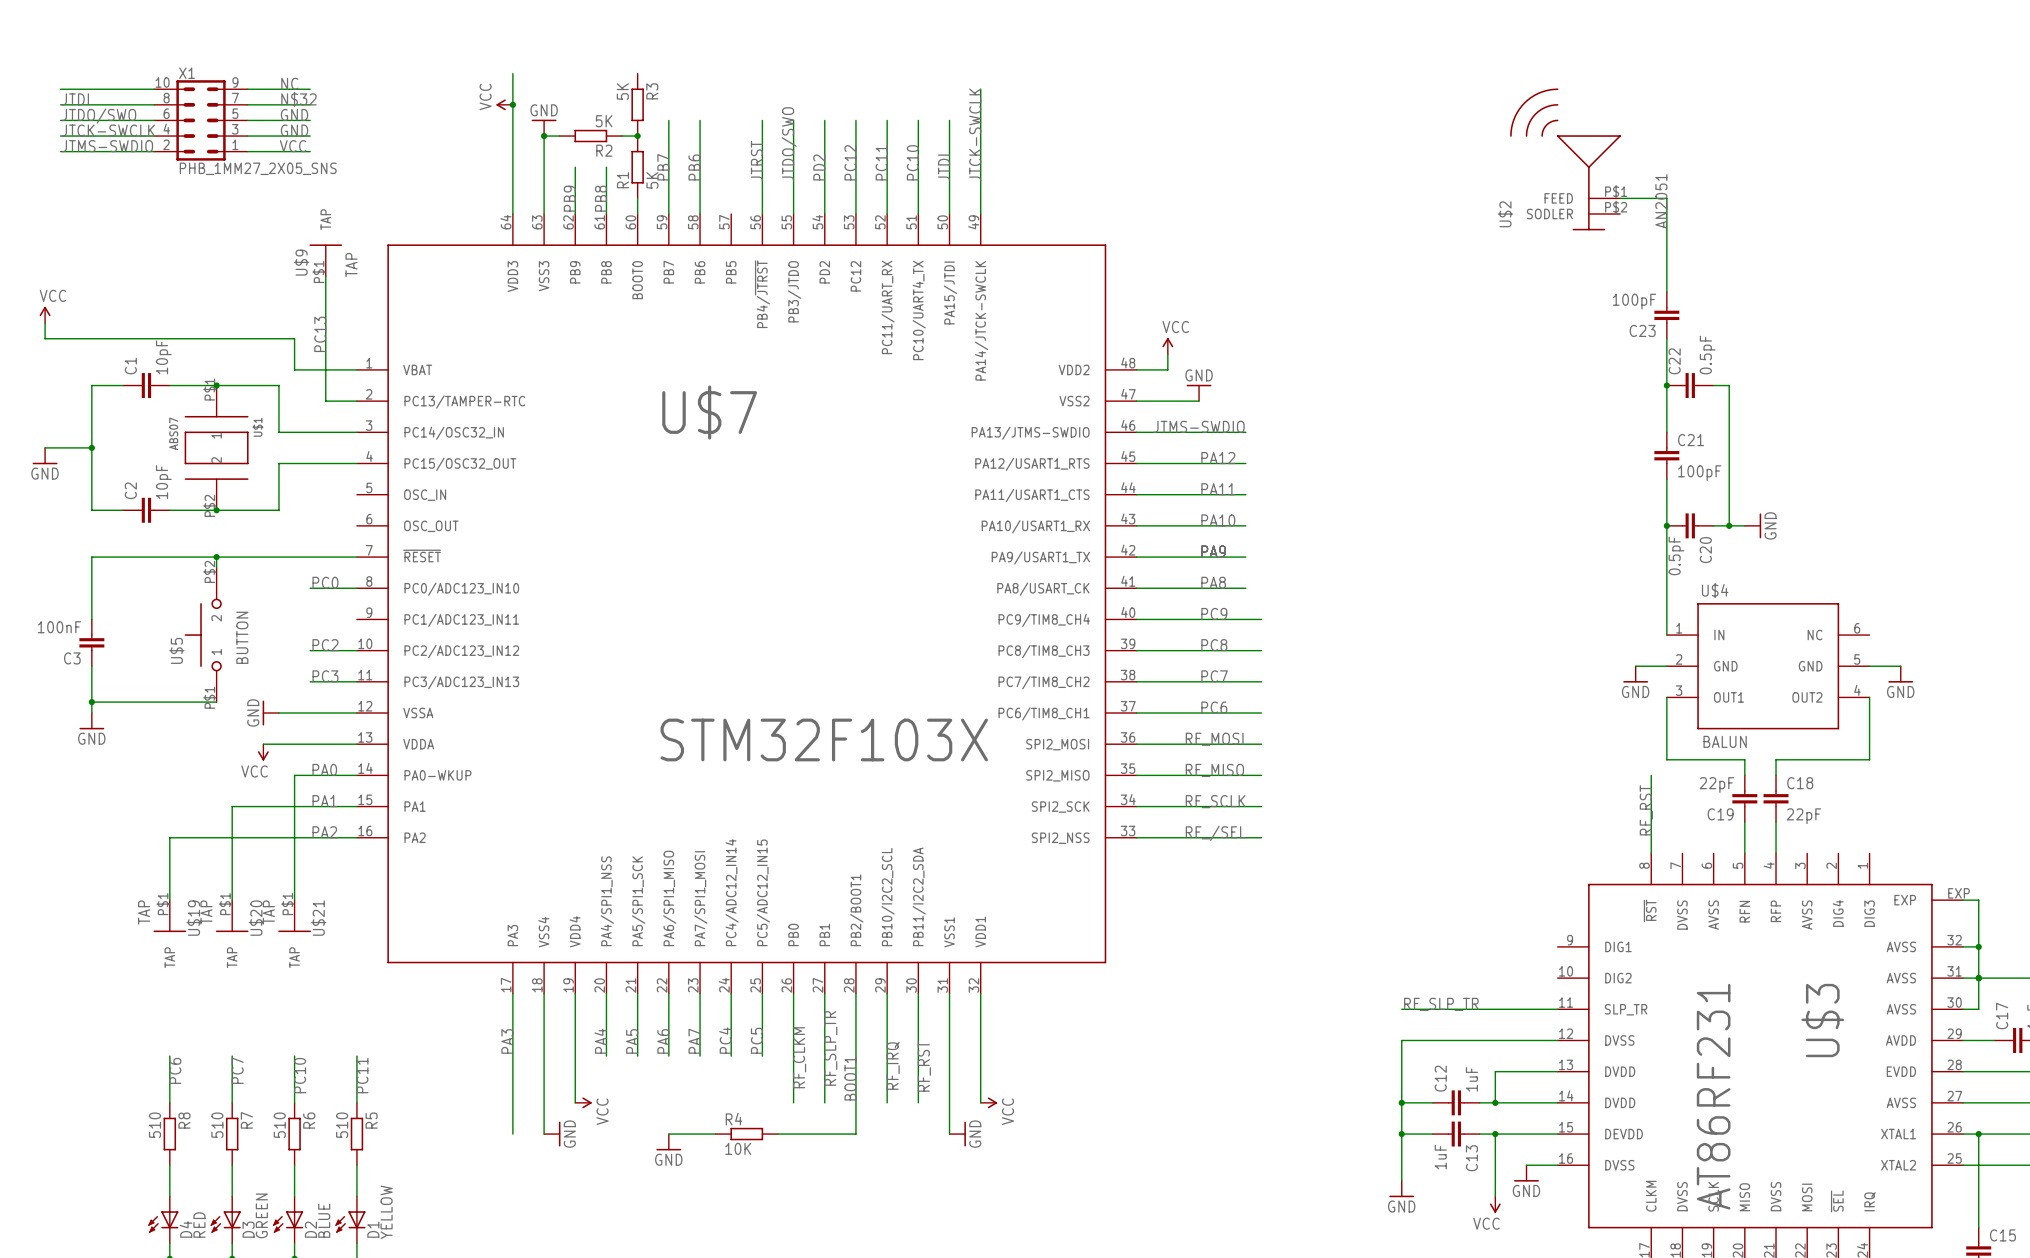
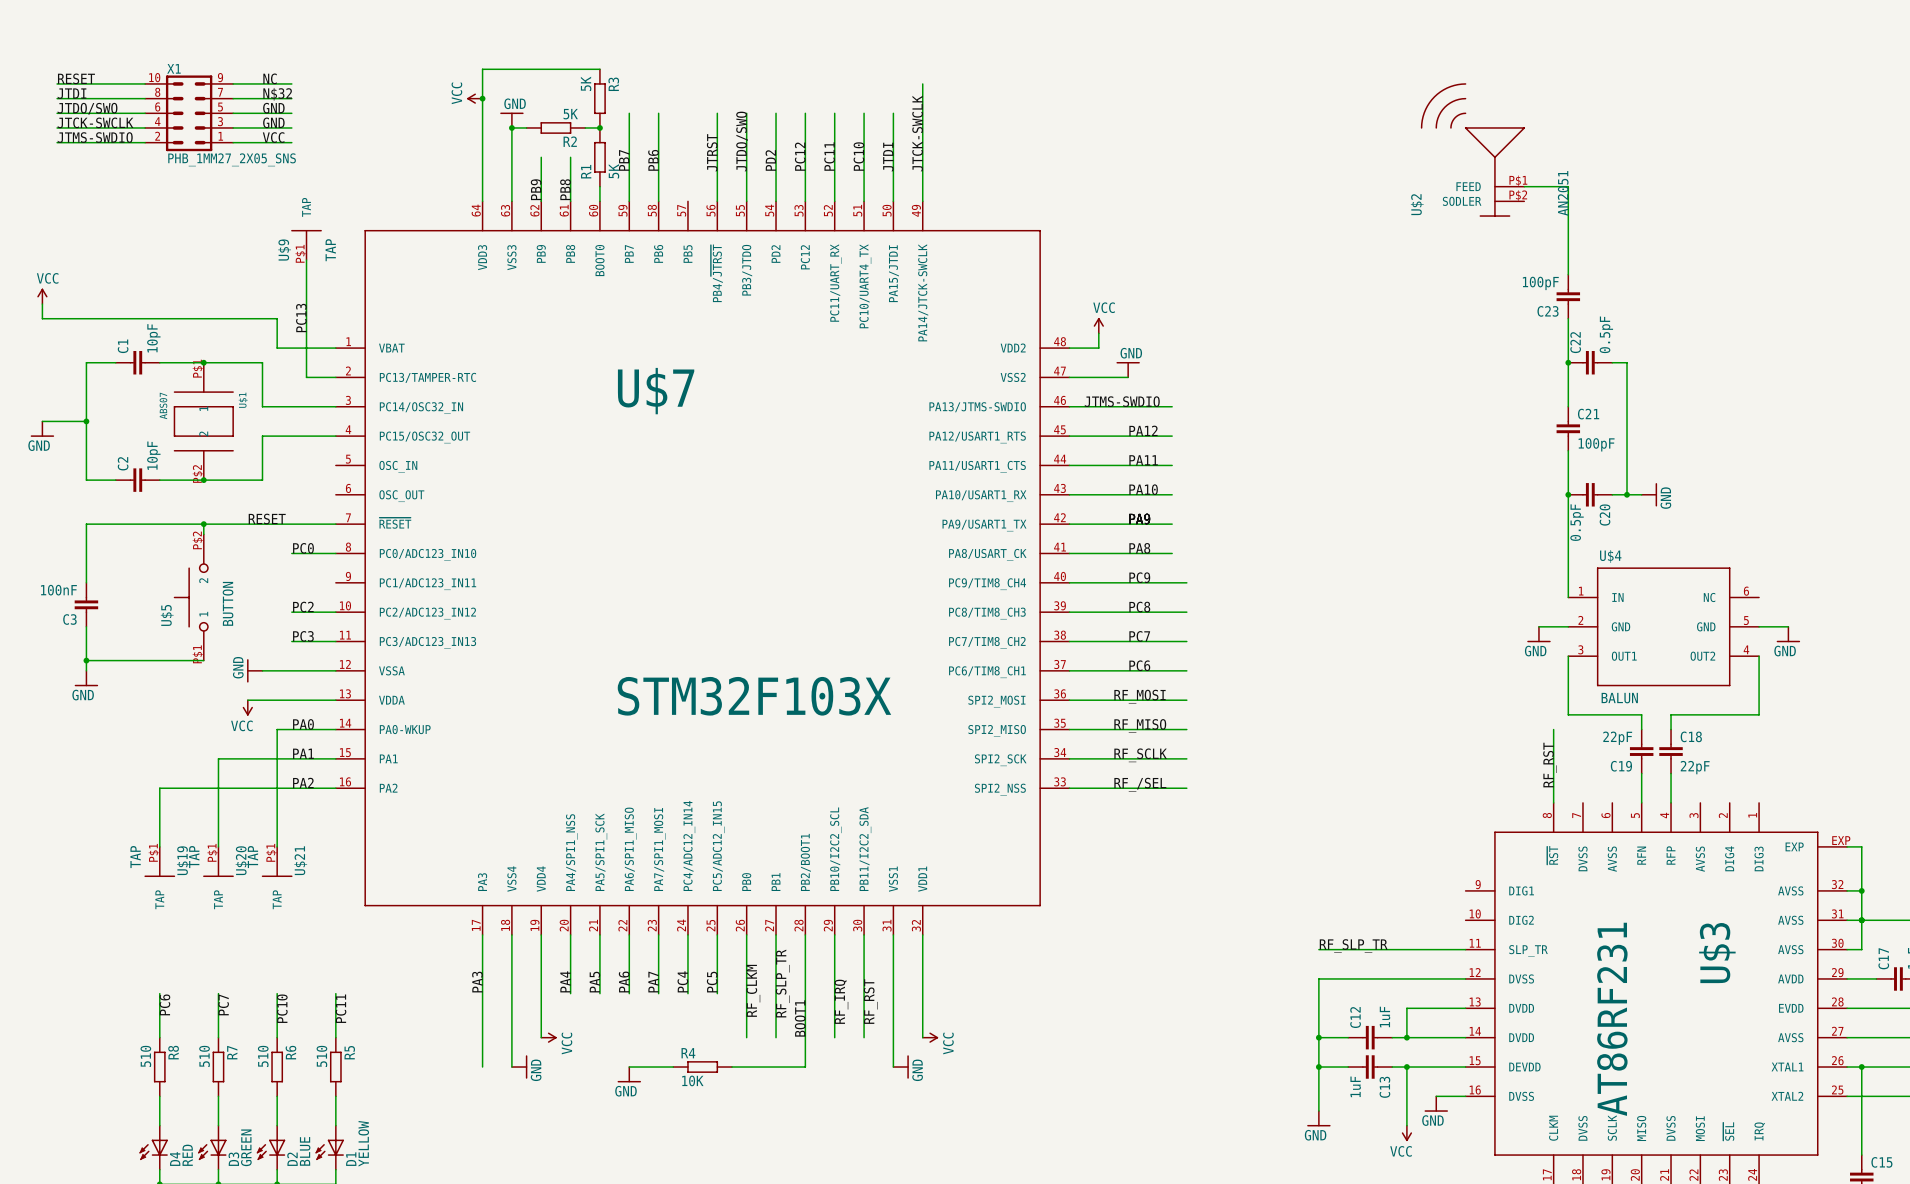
wire: none -> (482, 69) (599, 69)
label: none -> RESET (76, 78)
label: none -> RESET (267, 519)

